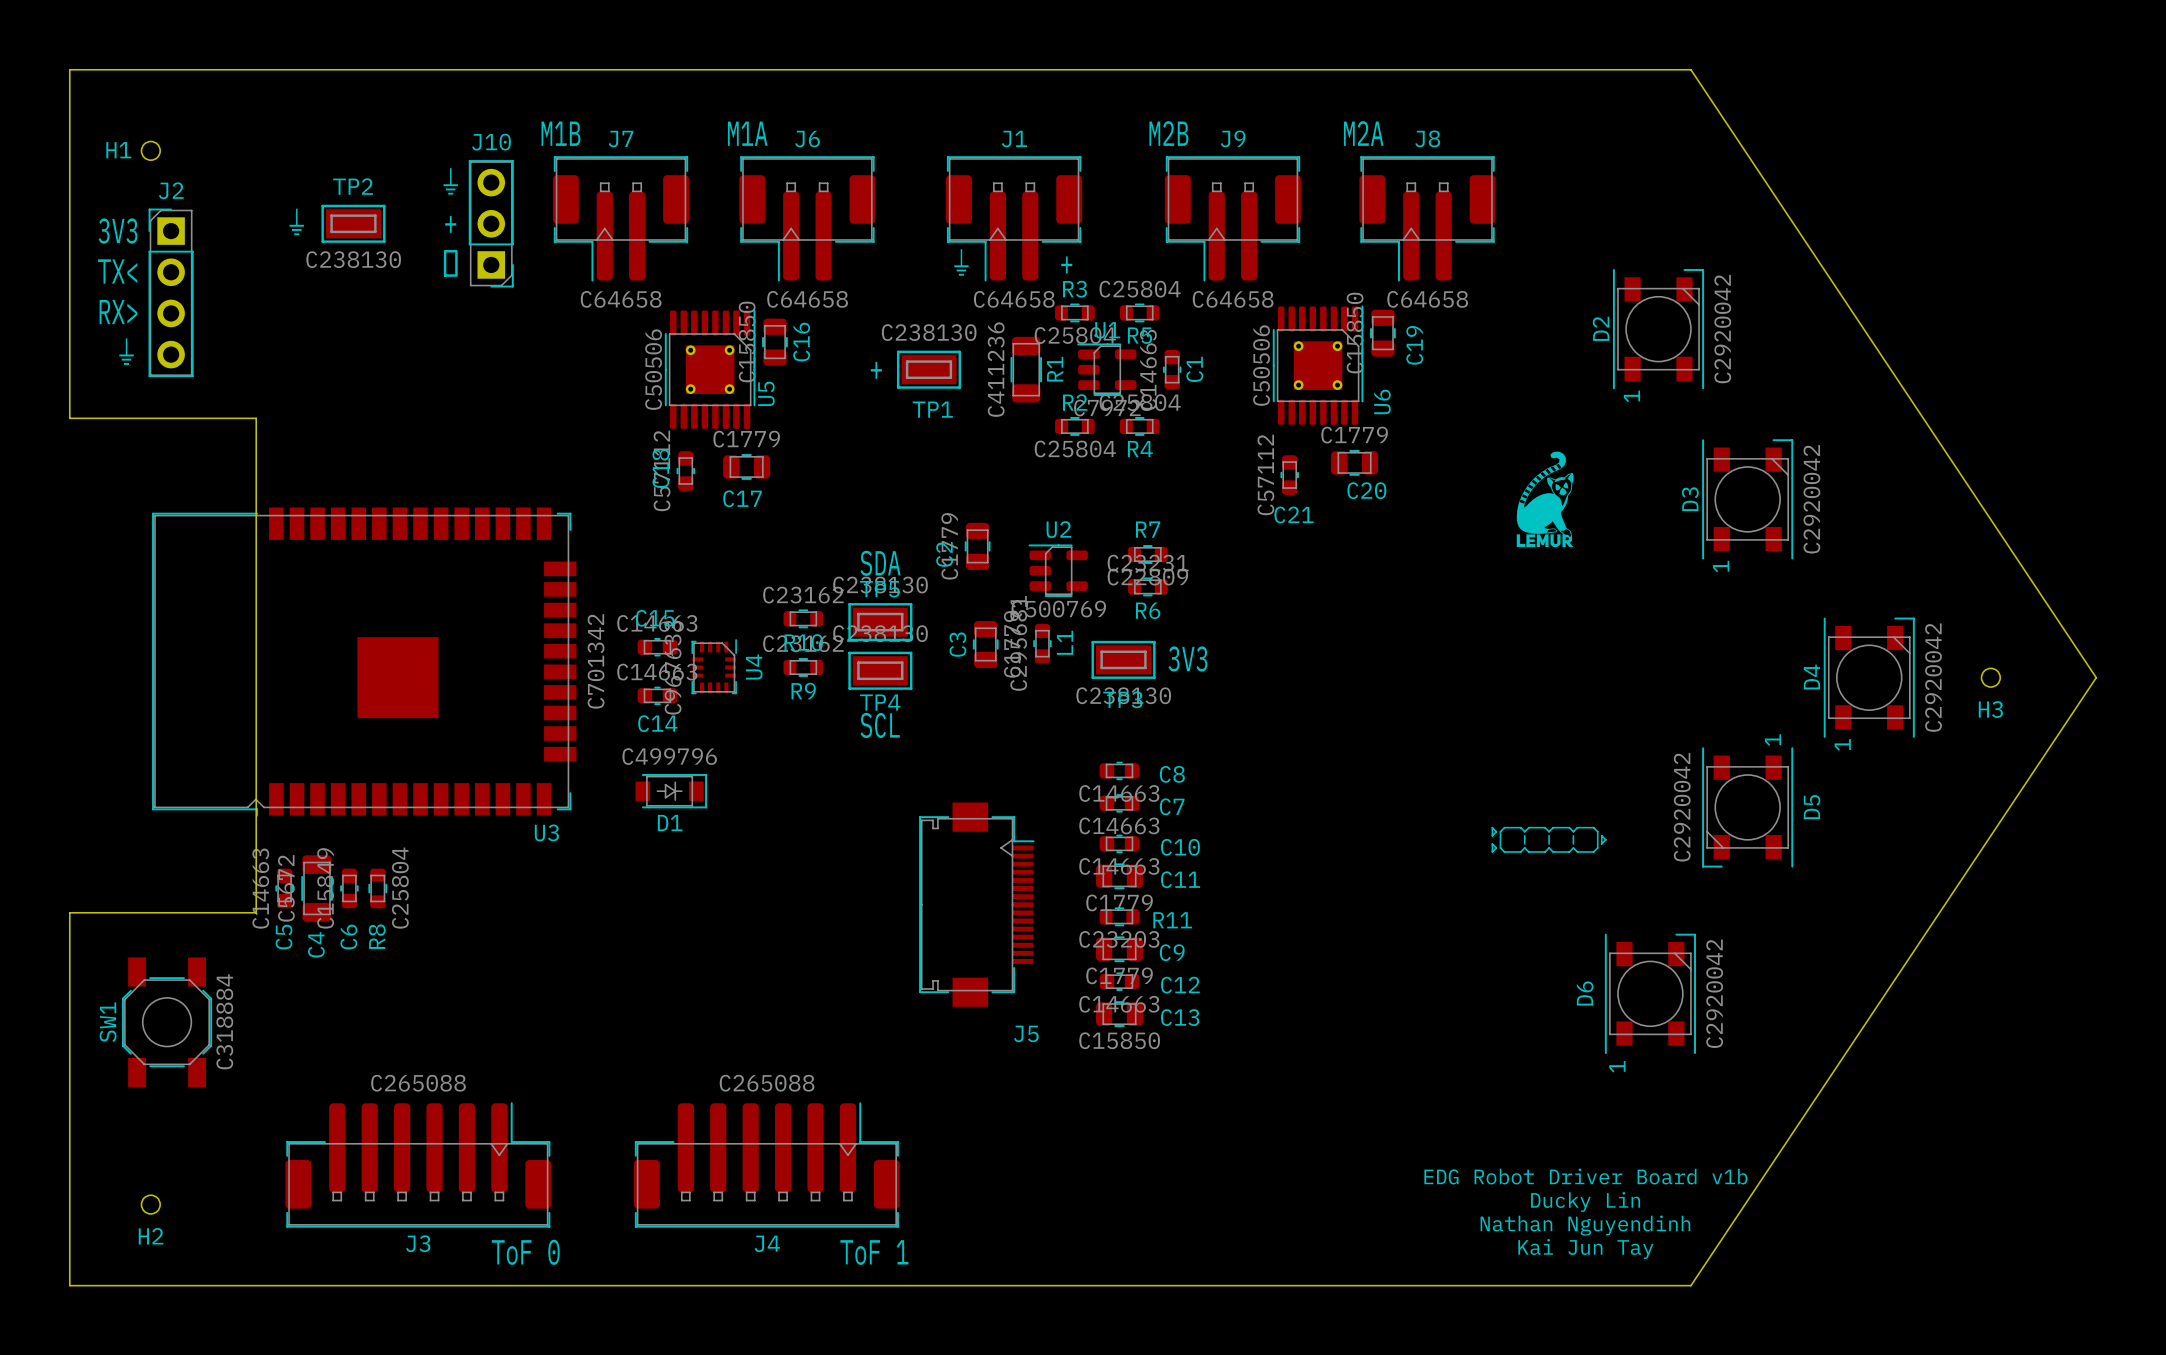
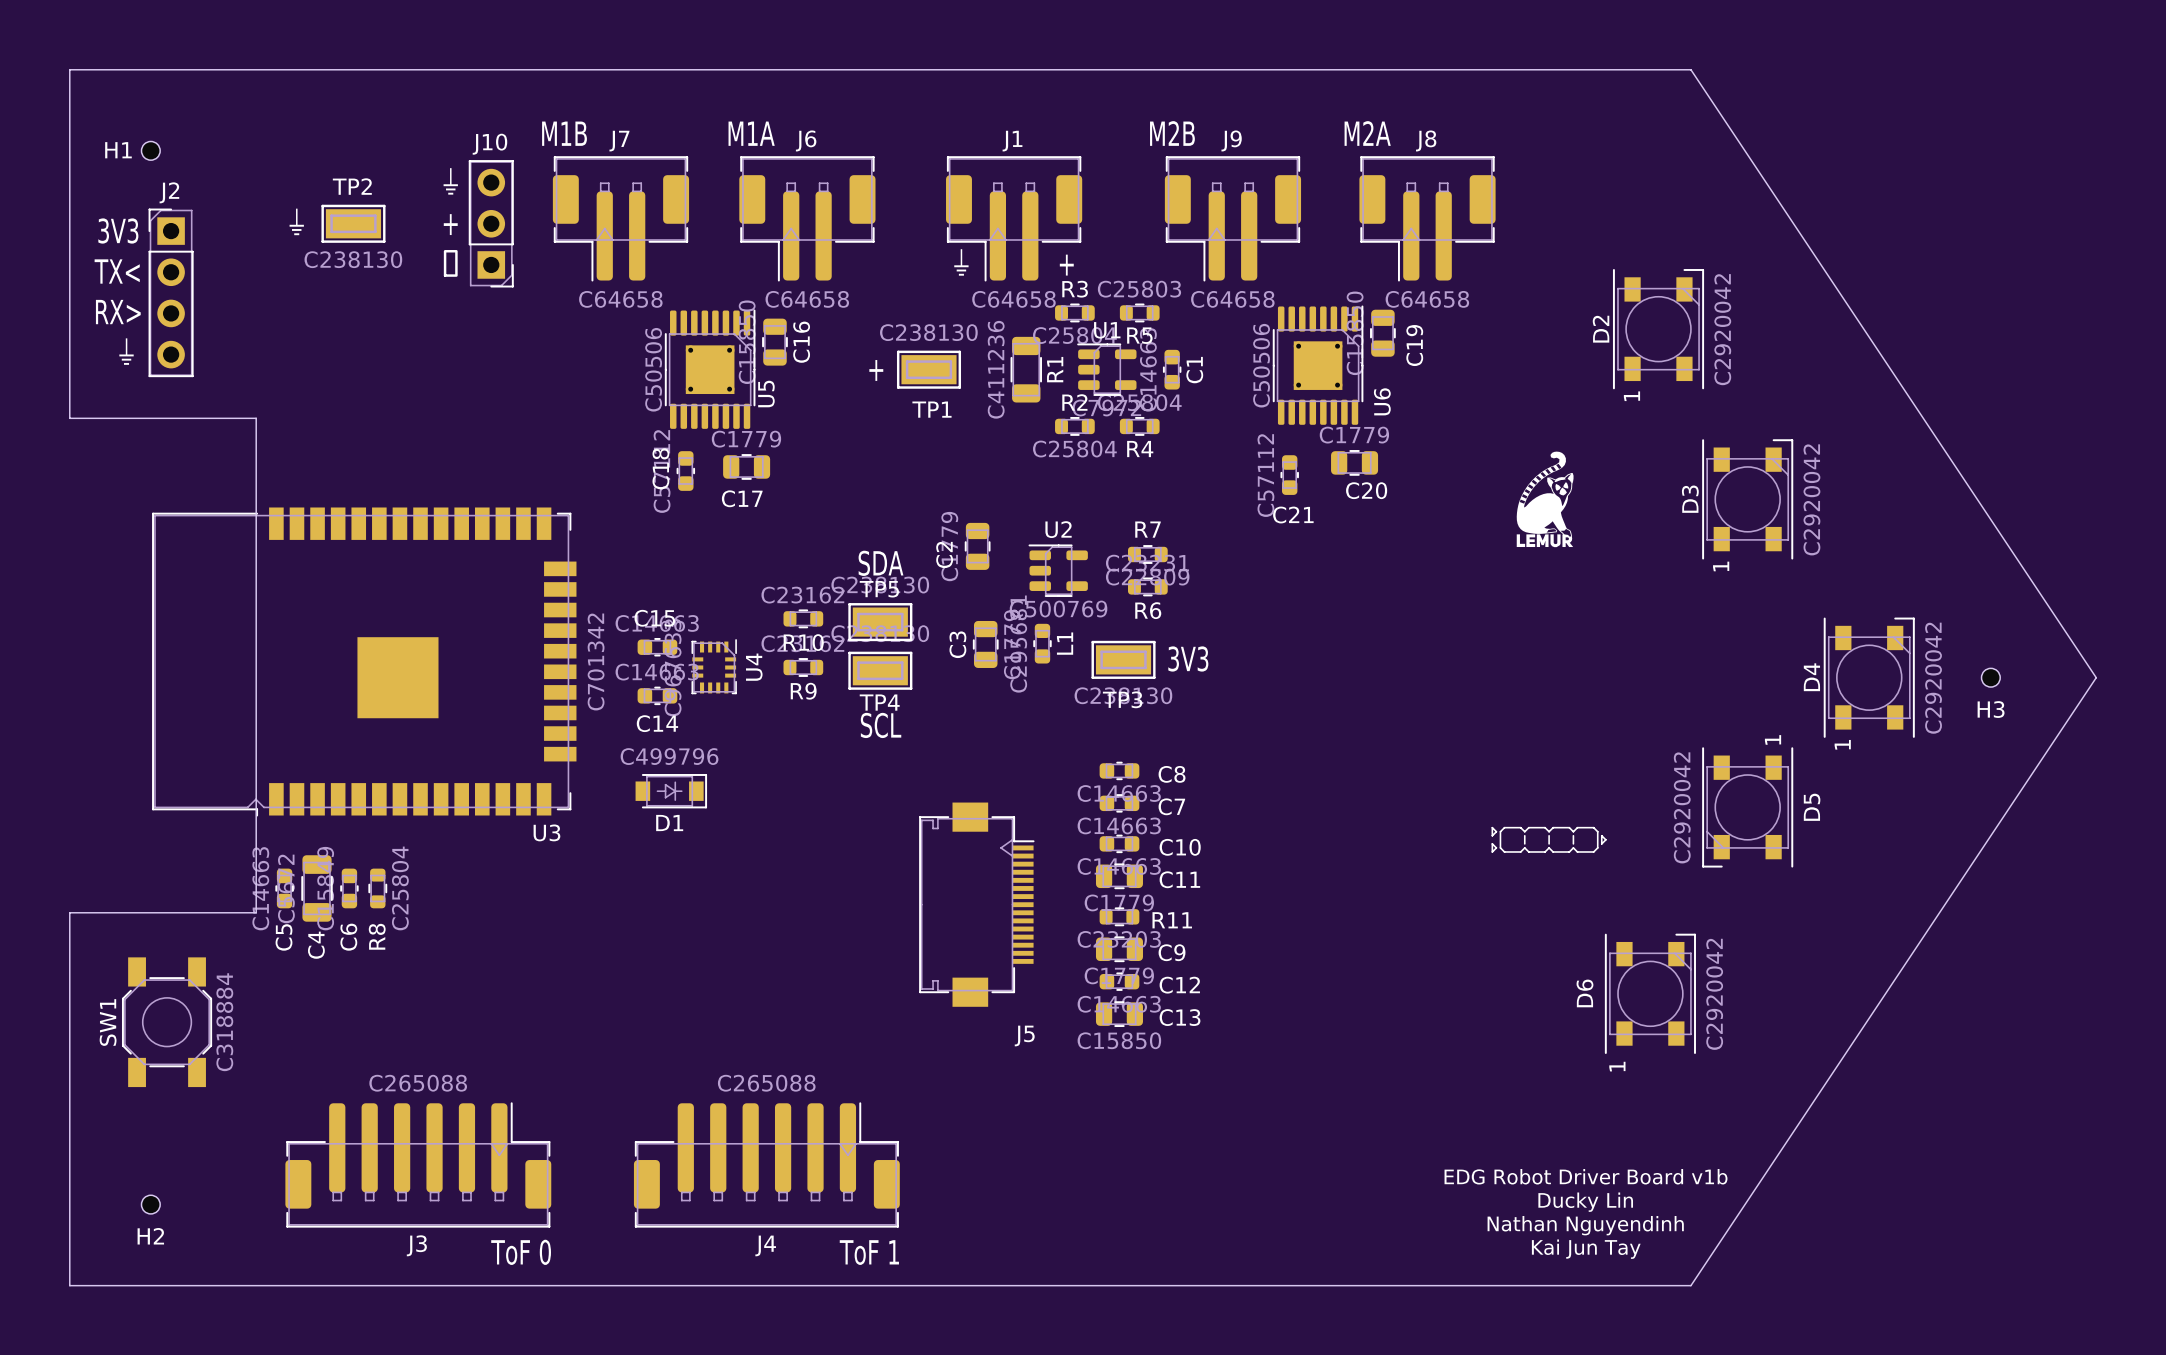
R5 value: C25804 (1140, 289) -> C25803 (1139, 289)

